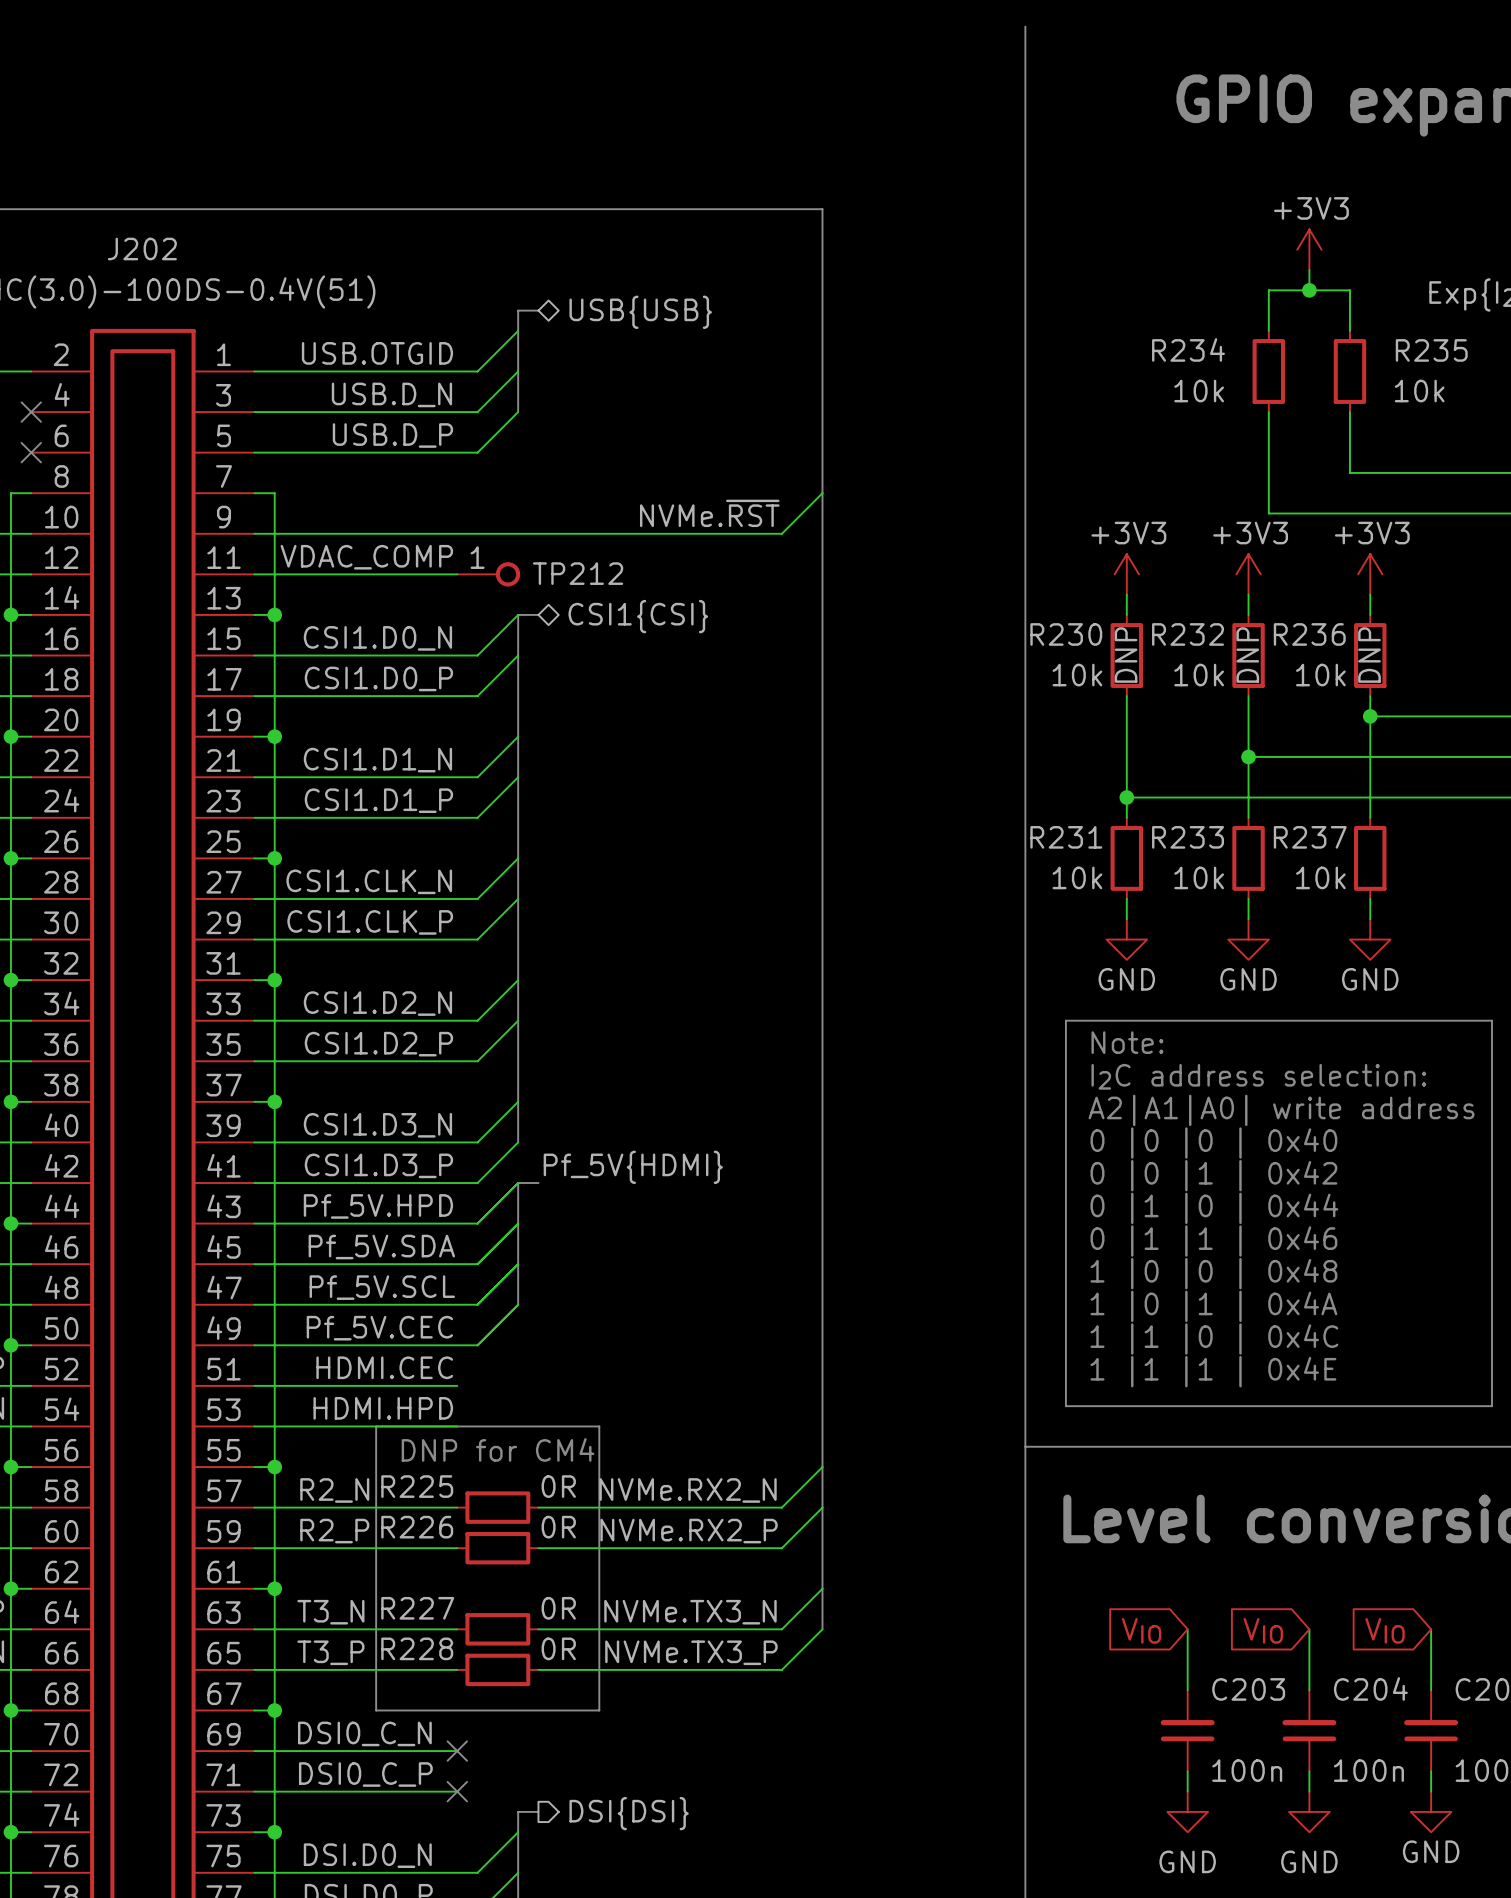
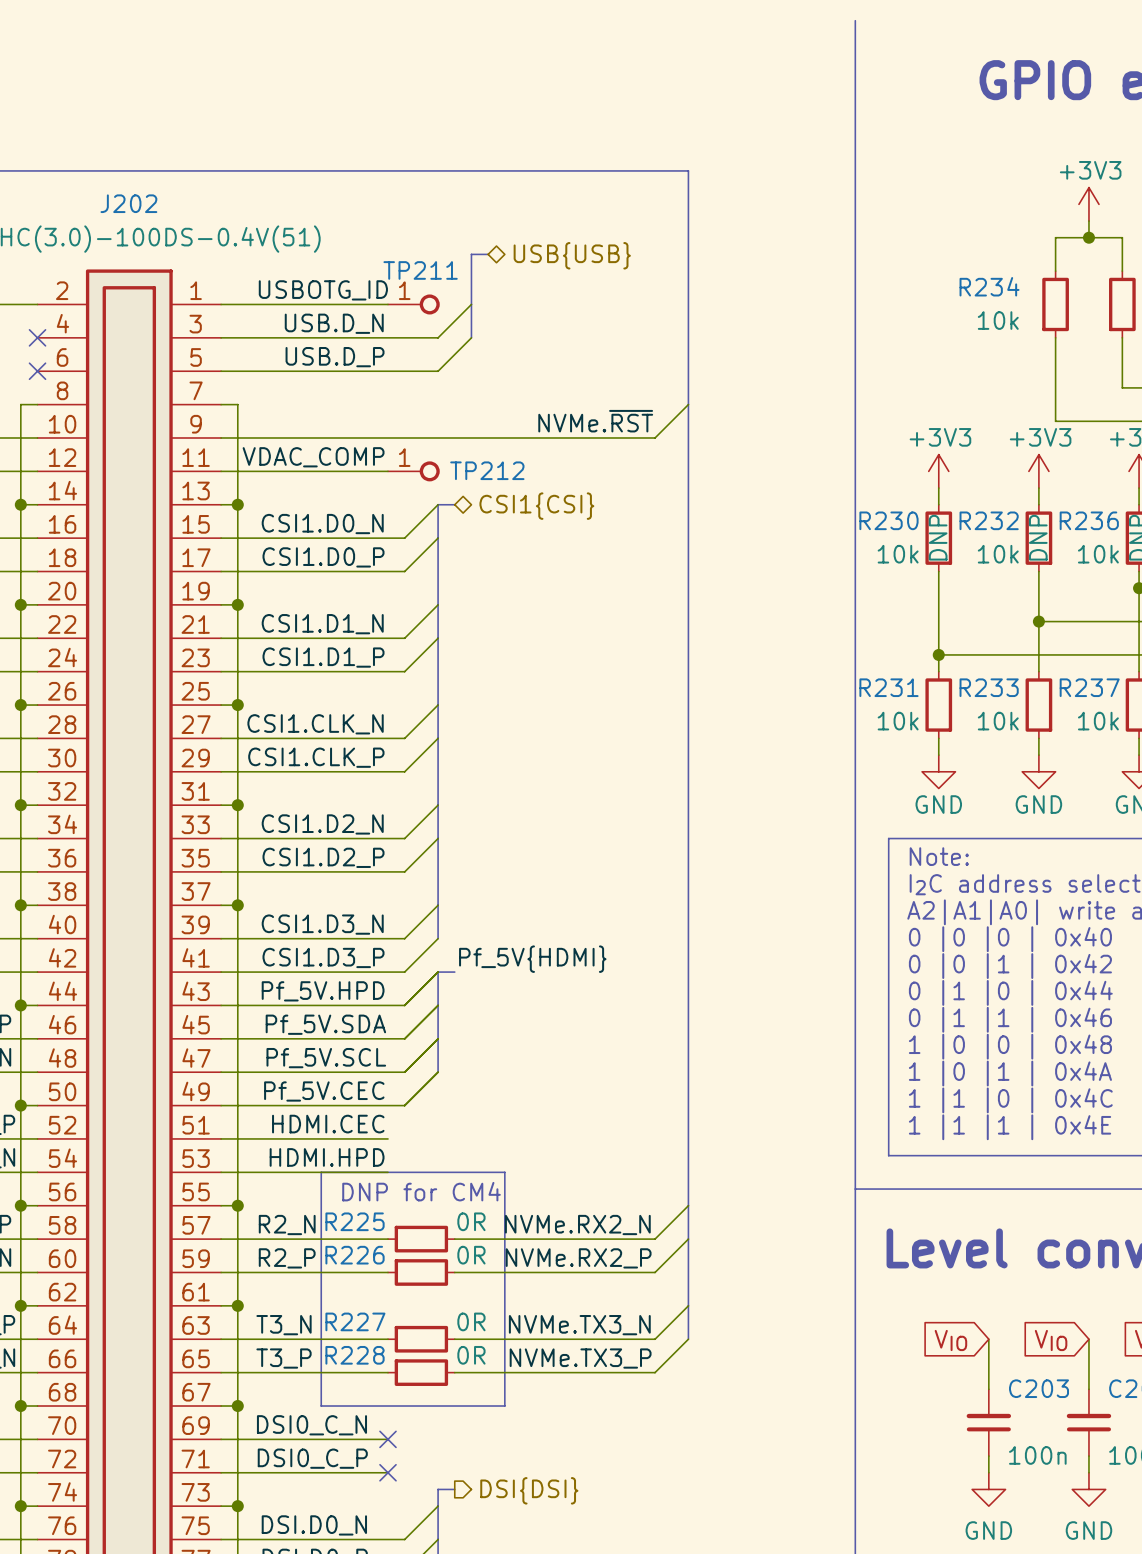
bus: (538, 310) (518, 310) (518, 412) -> (488, 254) (471, 254) (471, 337)
hierarchical label position: USB{USB} (640, 312) -> USB{USB} (572, 255)
wire: (518, 330) (477, 371) (457, 371) -> none
label: USB.OTGID (377, 353) -> USBOTG_ID (323, 290)
TP211: none -> (413, 304)
wire: (518, 371) (477, 412) -> (471, 304) (438, 337) (404, 337)
wire: (518, 412) (477, 452) -> (471, 337) (438, 371) (404, 371)

